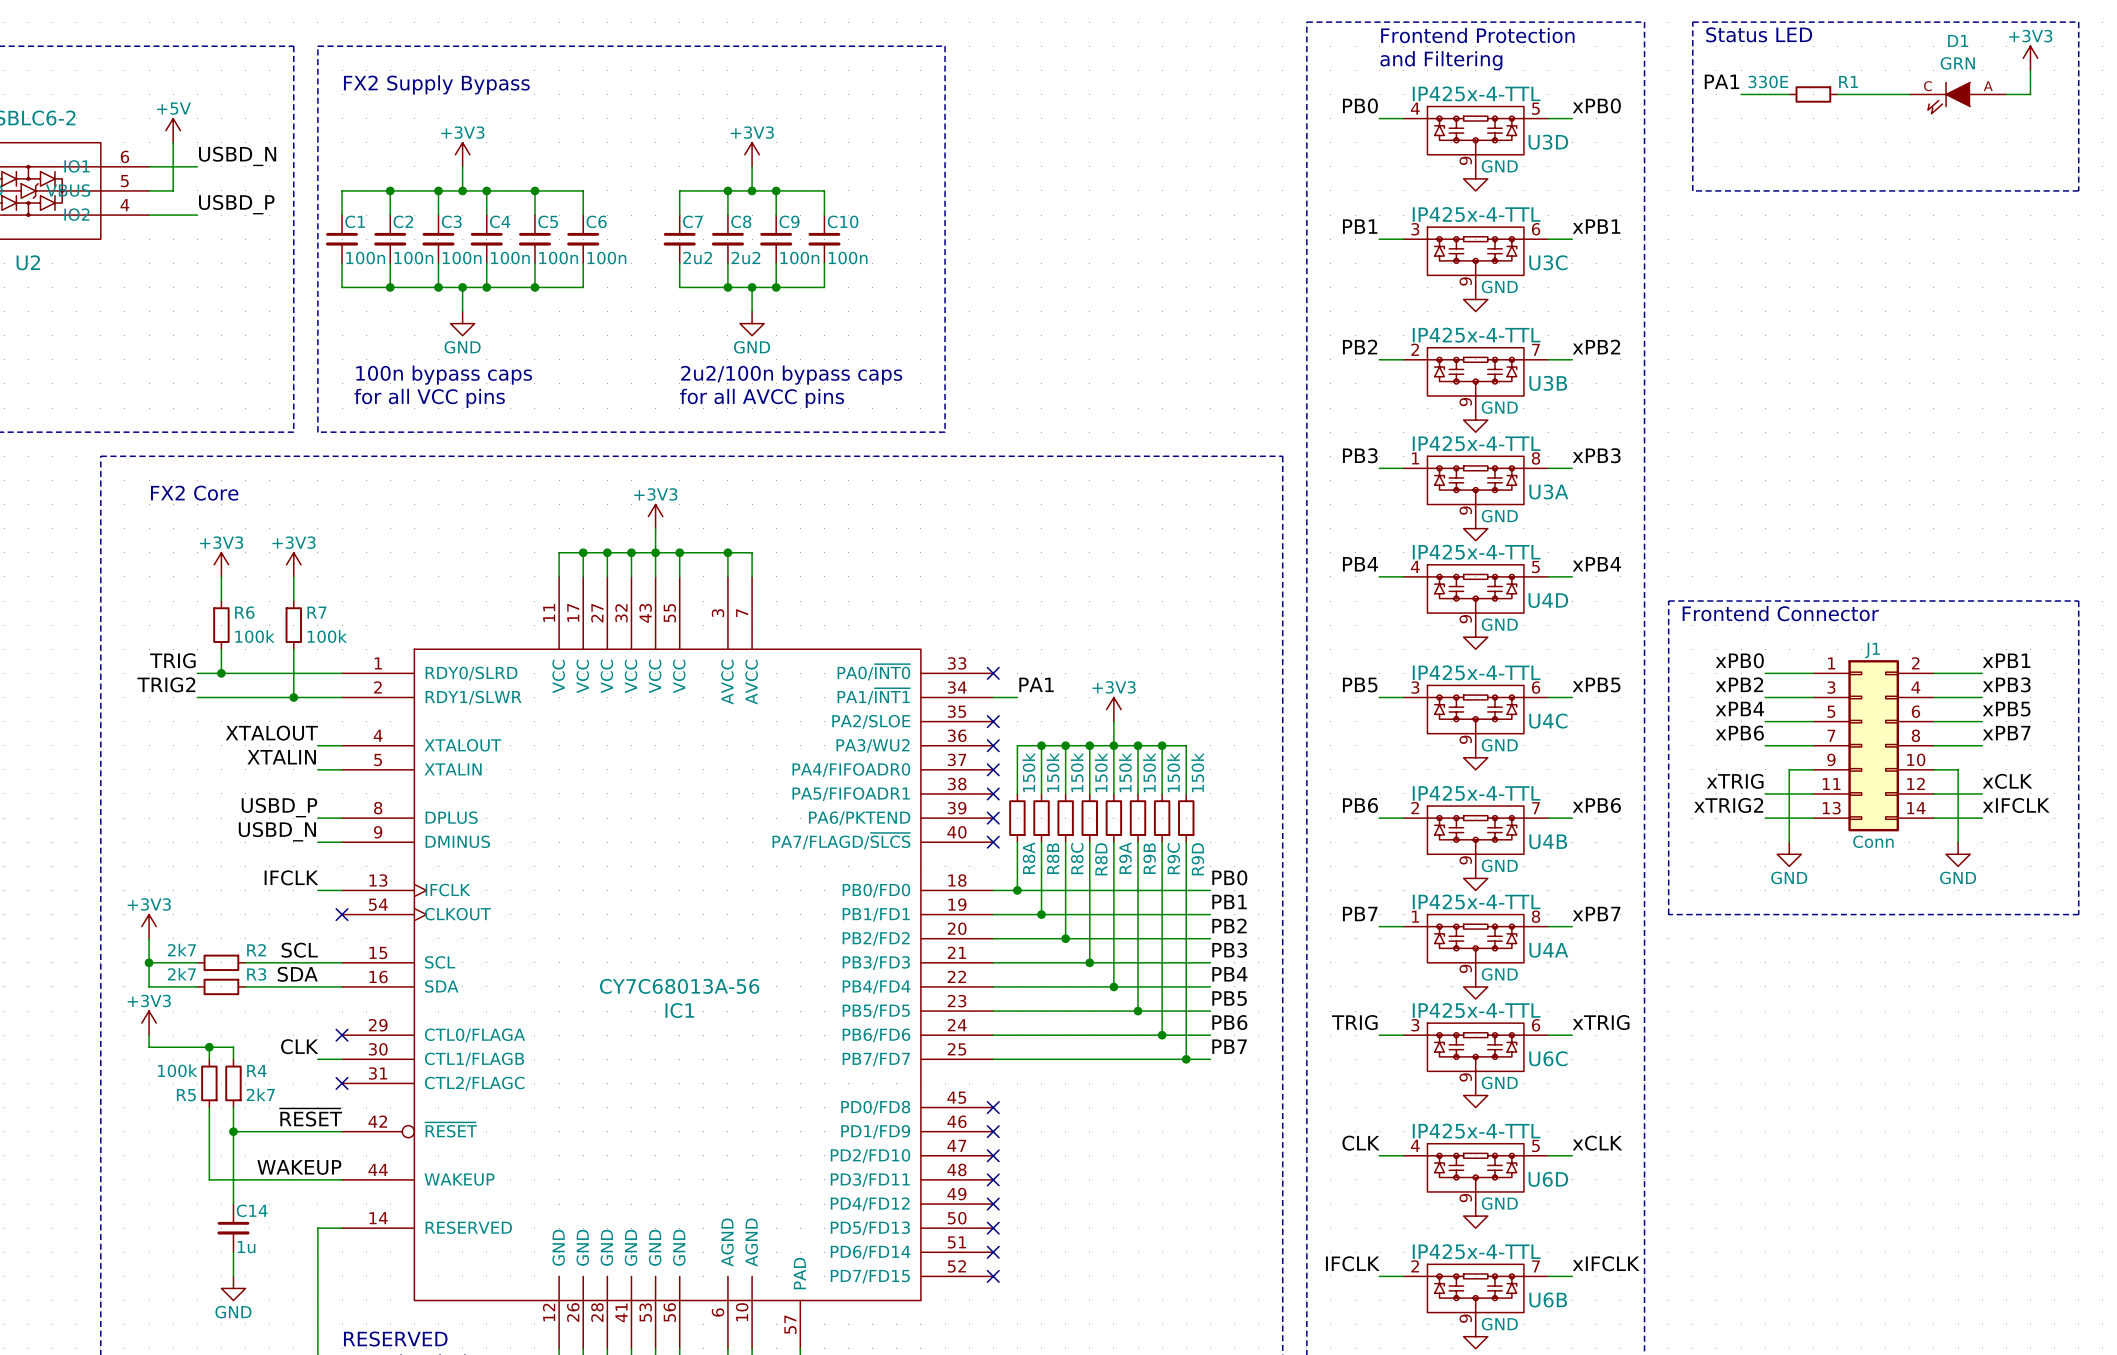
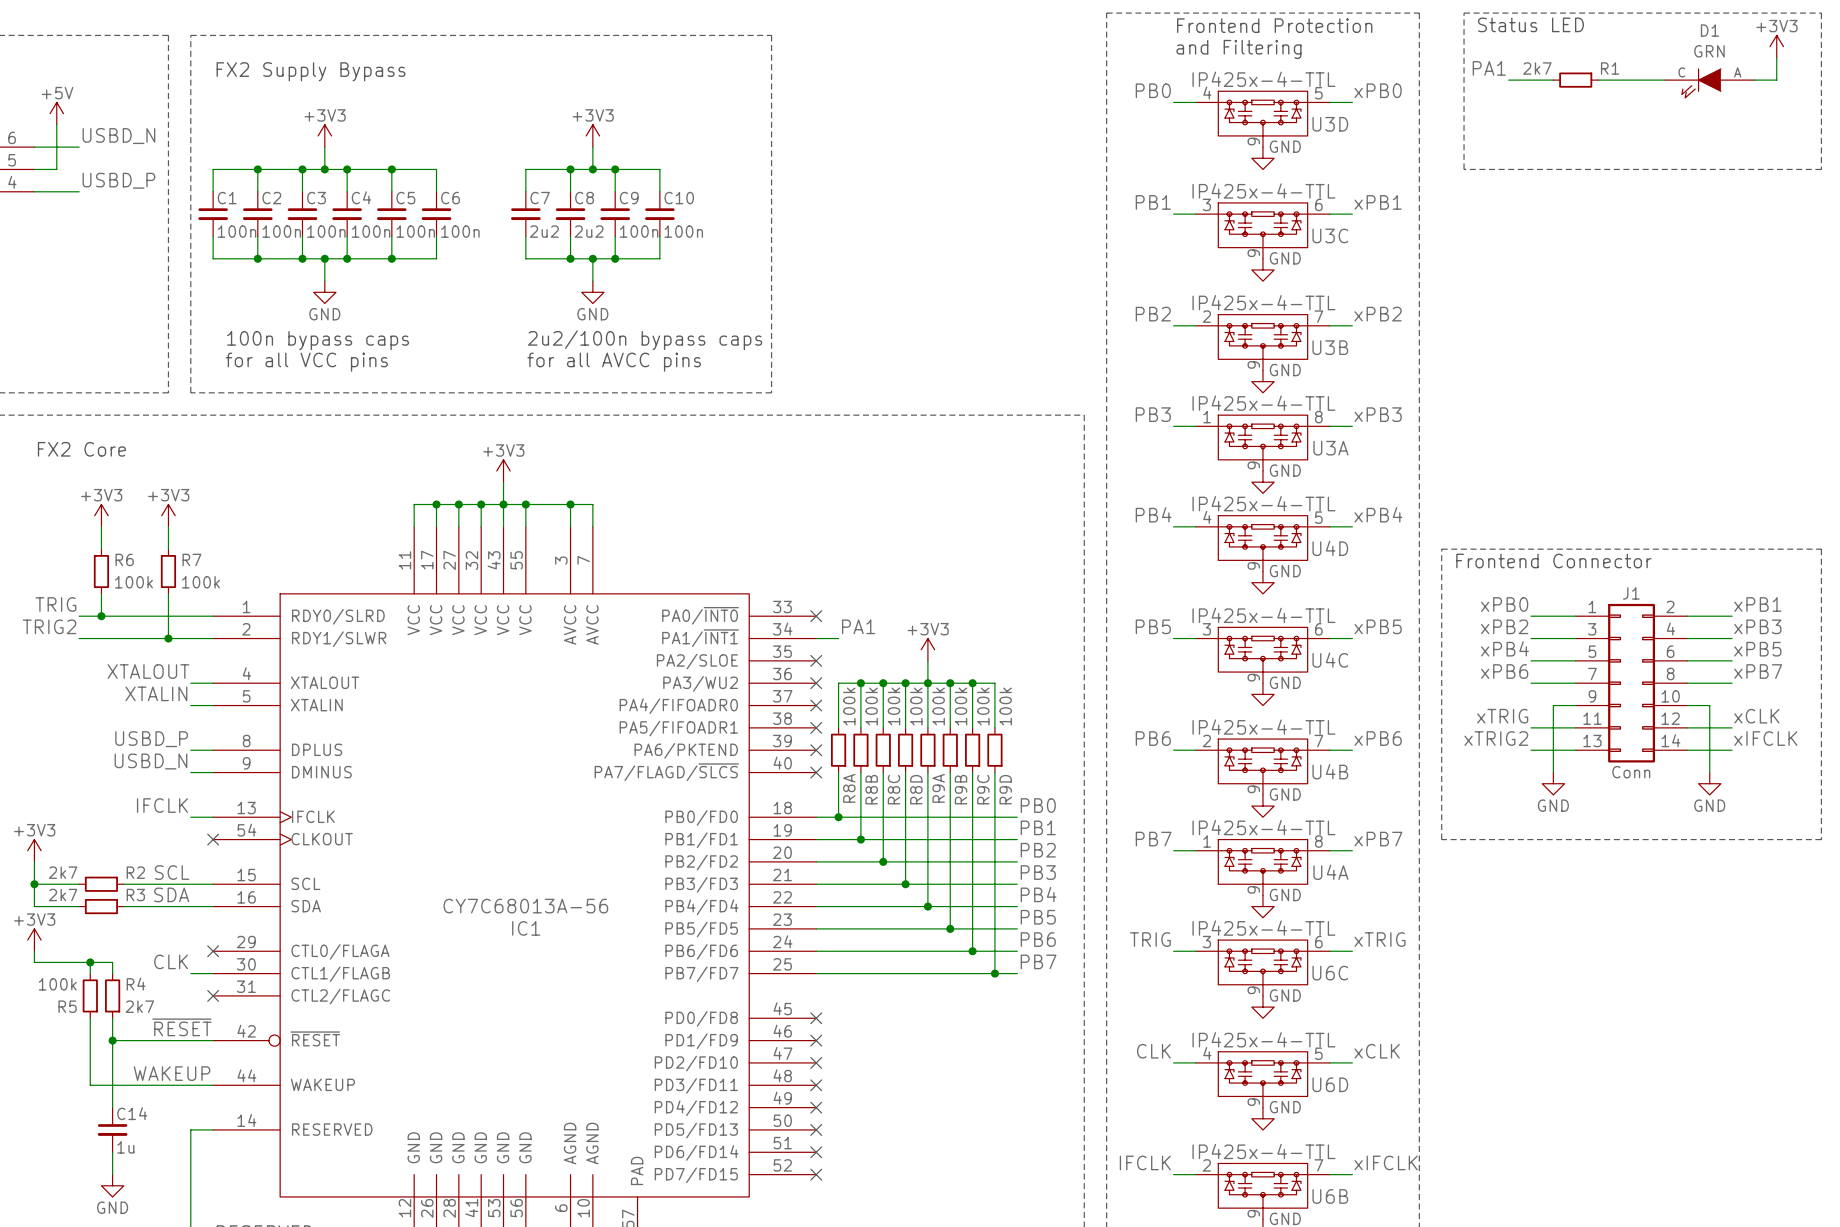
R1 value: 330E (1768, 81) -> 2k7 (1537, 68)
R8A value: 150k (1028, 772) -> 100k (849, 706)
R8B value: 150k (1052, 772) -> 100k (871, 706)
R8C value: 150k (1077, 772) -> 100k (894, 706)
R8D value: 150k (1101, 772) -> 100k (916, 706)
R9A value: 150k (1125, 772) -> 100k (938, 706)
R9B value: 150k (1149, 772) -> 100k (961, 706)
R9C value: 150k (1173, 772) -> 100k (983, 706)
R9D value: 150k (1197, 772) -> 100k (1005, 706)

